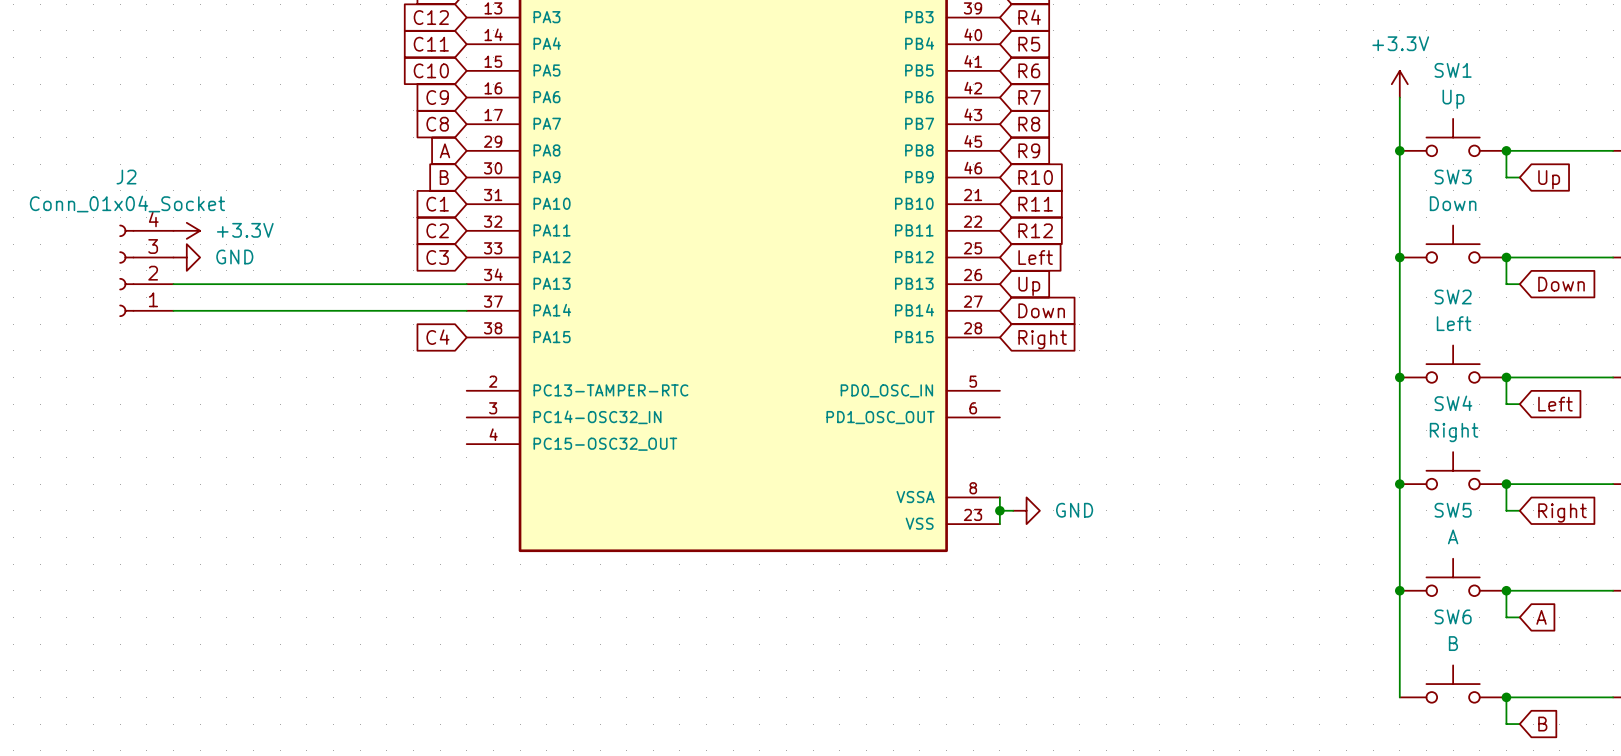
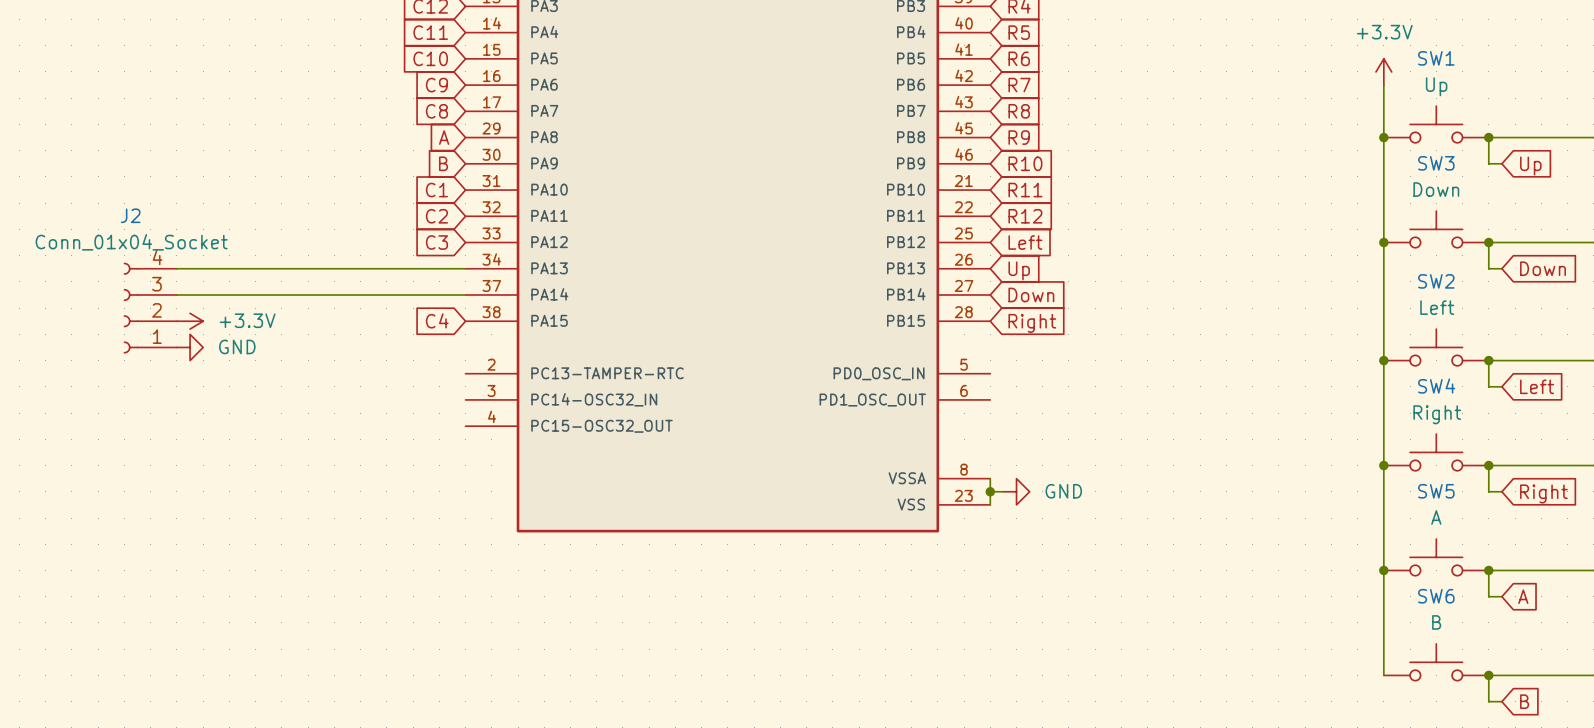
power symbol position: +3.3V (186, 230) -> +3.3V (190, 321)
power symbol position: GND (186, 257) -> GND (190, 347)
J2 position: (146, 270) -> (150, 308)

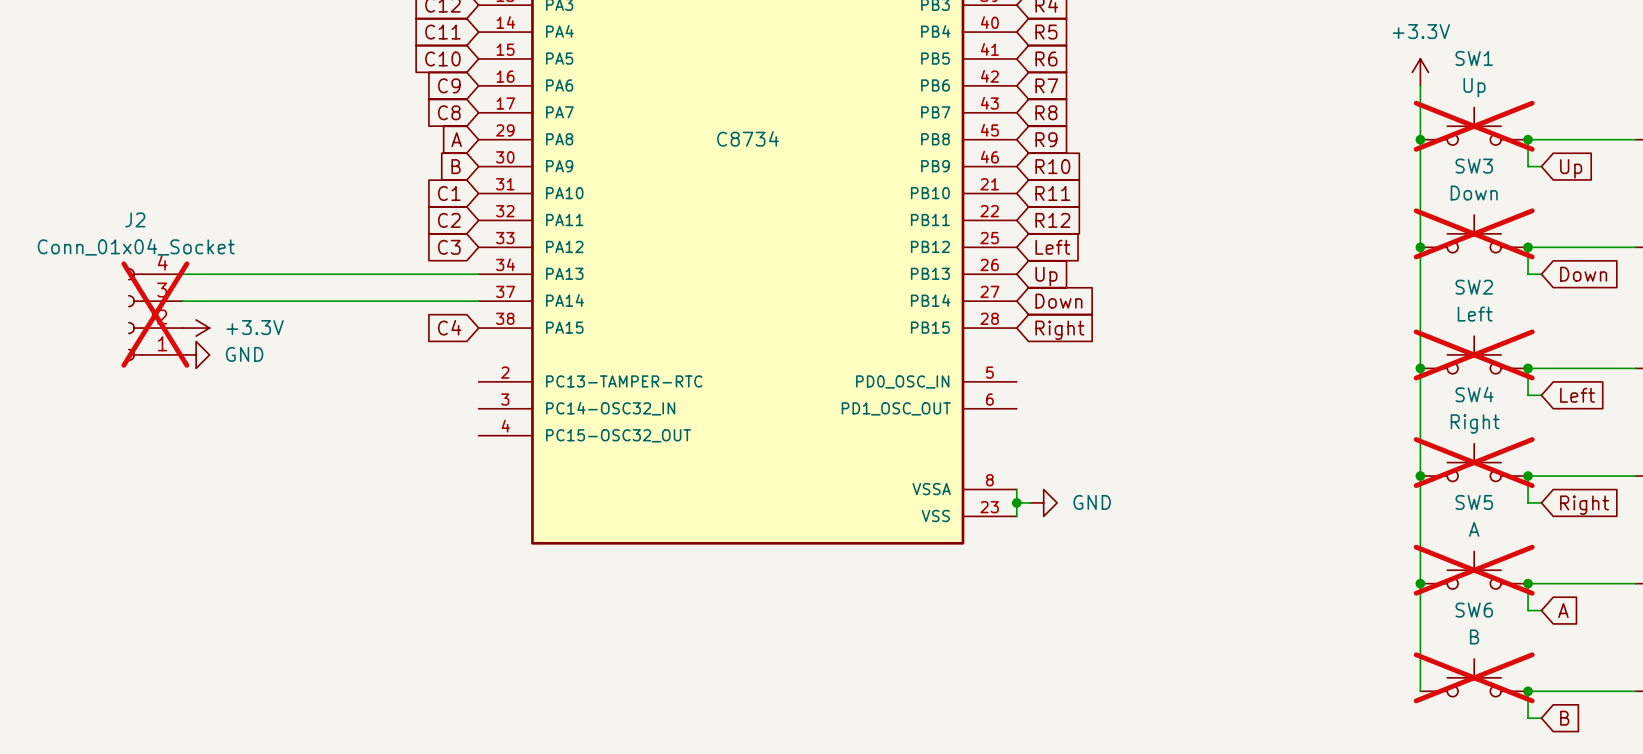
SW1 do-not-place cross: none -> (1474, 126)
part text: none -> C8734 (748, 138)
SW3 do-not-place cross: none -> (1474, 233)
J2 do-not-place cross: none -> (155, 314)
SW2 do-not-place cross: none -> (1474, 354)
SW4 do-not-place cross: none -> (1474, 462)
SW5 do-not-place cross: none -> (1474, 570)
SW6 do-not-place cross: none -> (1474, 677)

